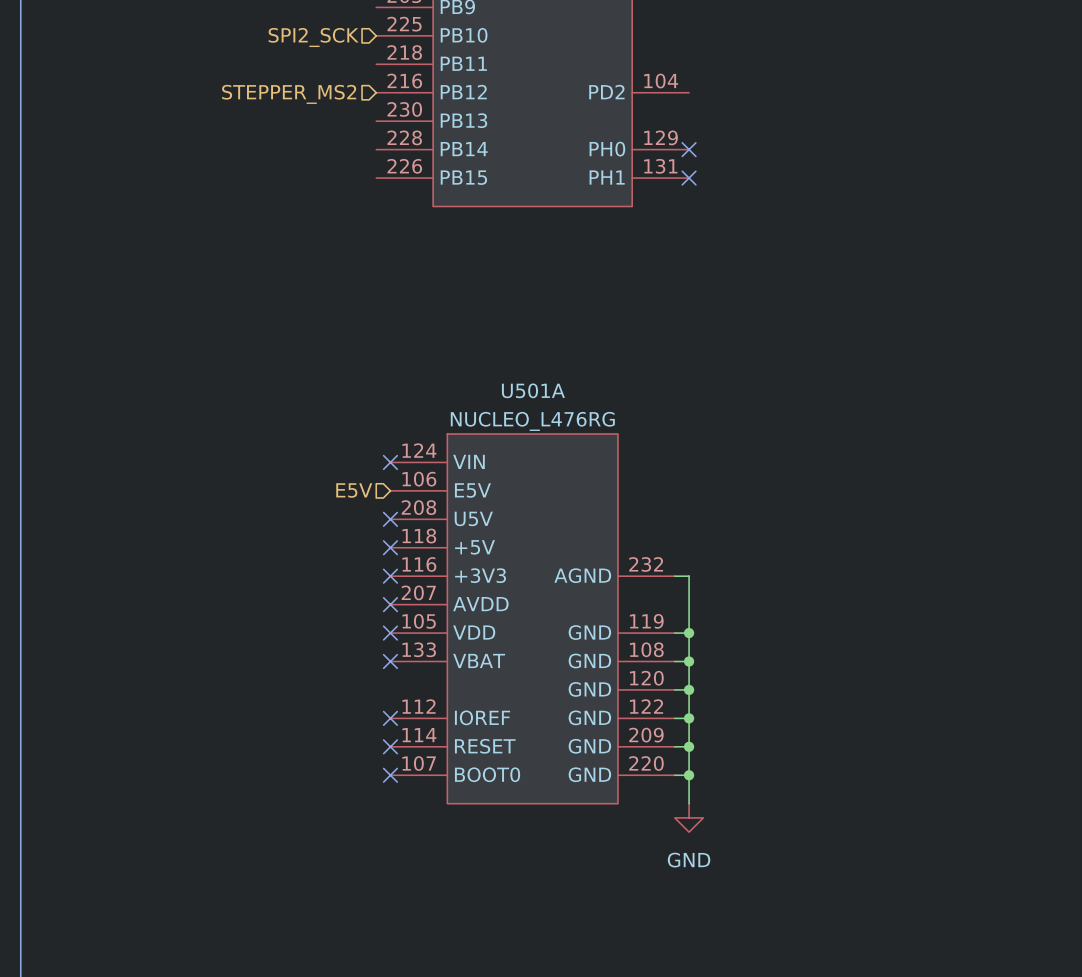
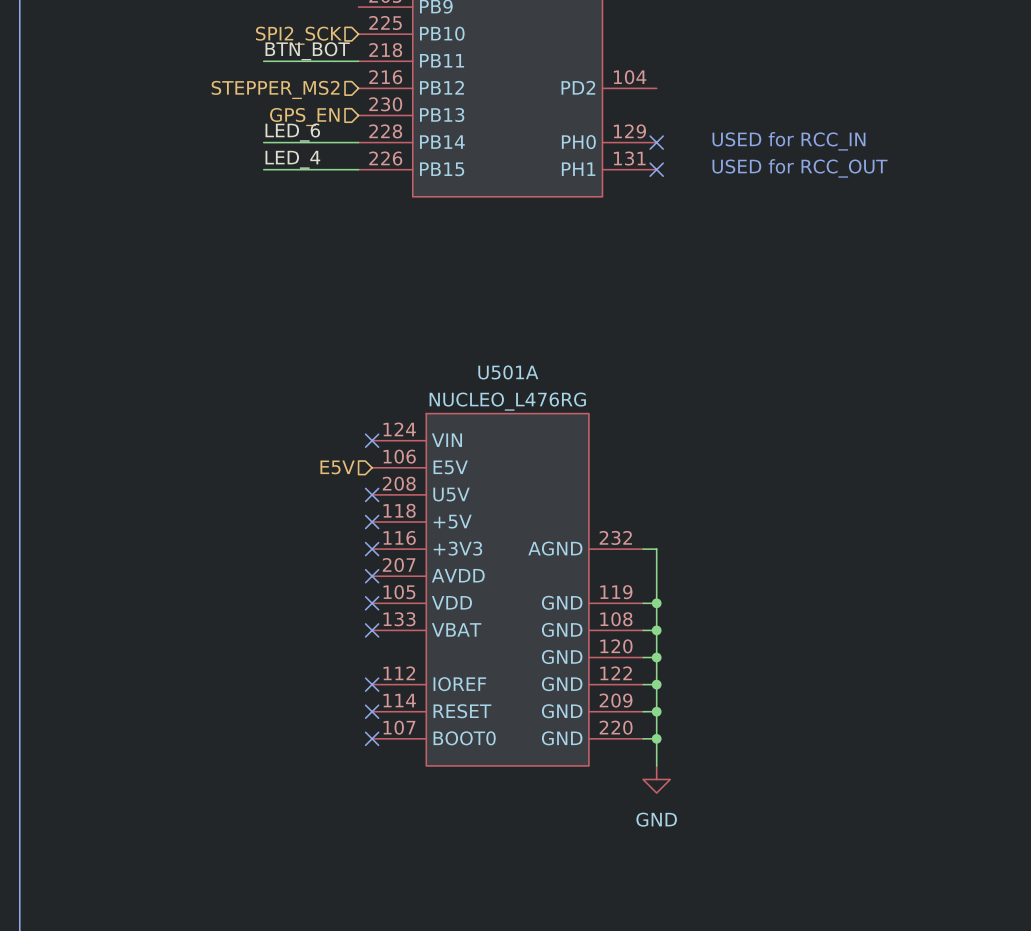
label: none -> BTN_BOT (307, 51)
wire: none -> (263, 61) (358, 61)
hierarchical label: none -> GPS_EN (304, 117)
label: none -> LED_6 (292, 132)
text: none -> USED for RCC_IN (788, 141)
wire: none -> (263, 142) (358, 142)
label: none -> LED_4 (292, 159)
text: none -> USED for RCC_OUT (800, 168)
wire: none -> (263, 169) (358, 169)

